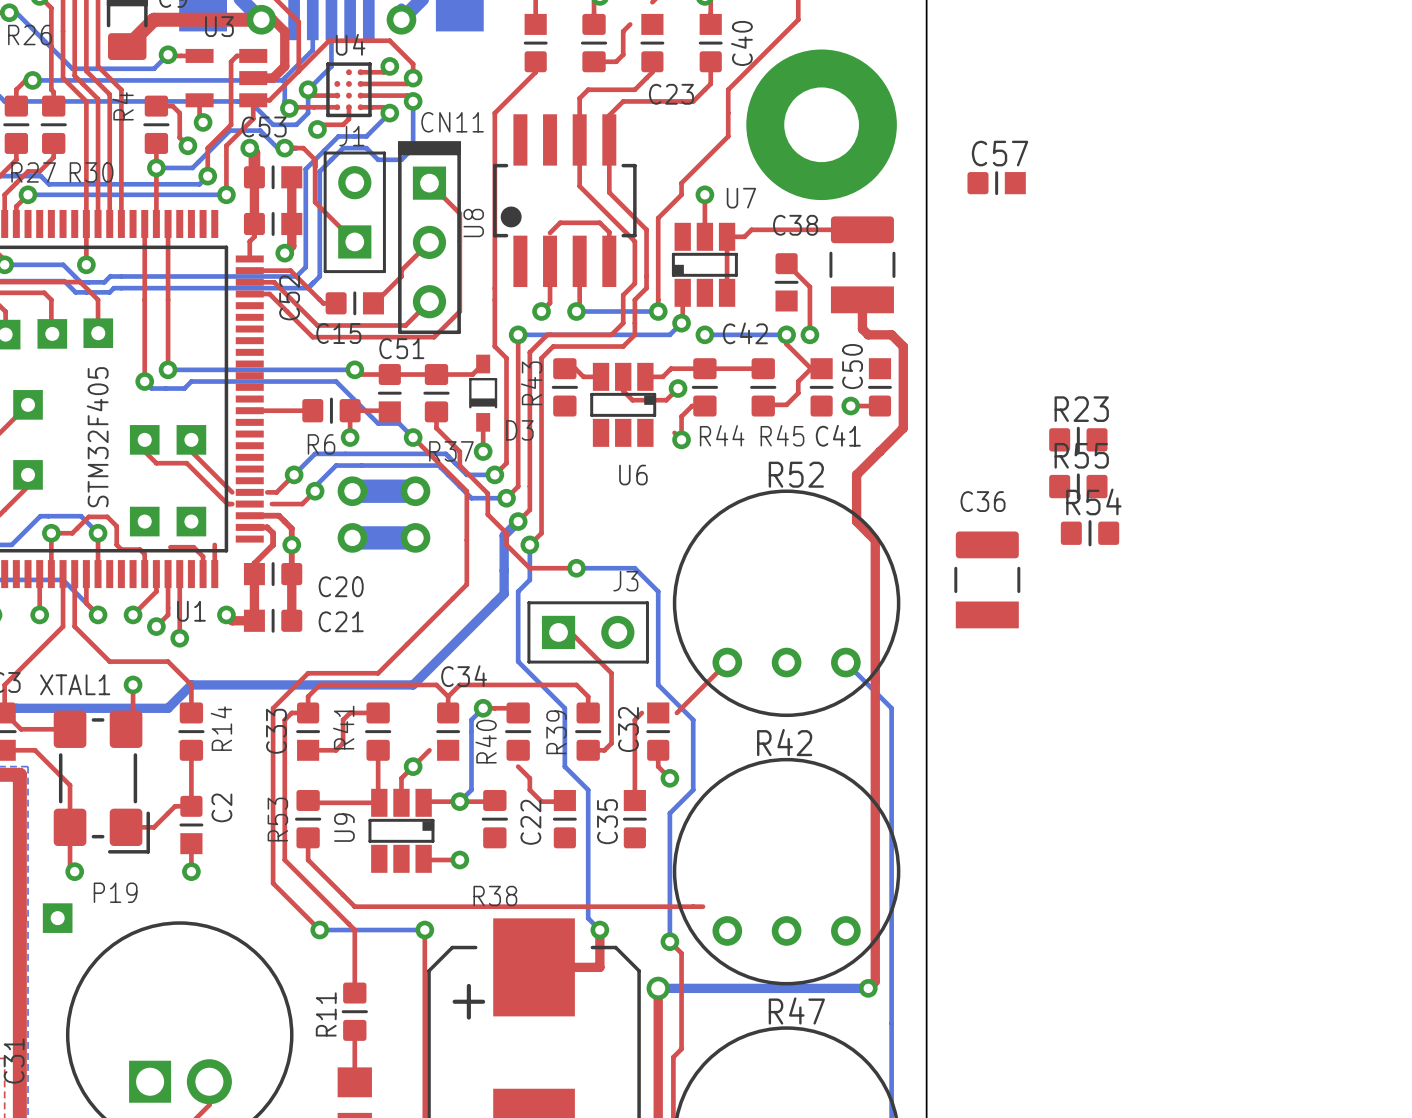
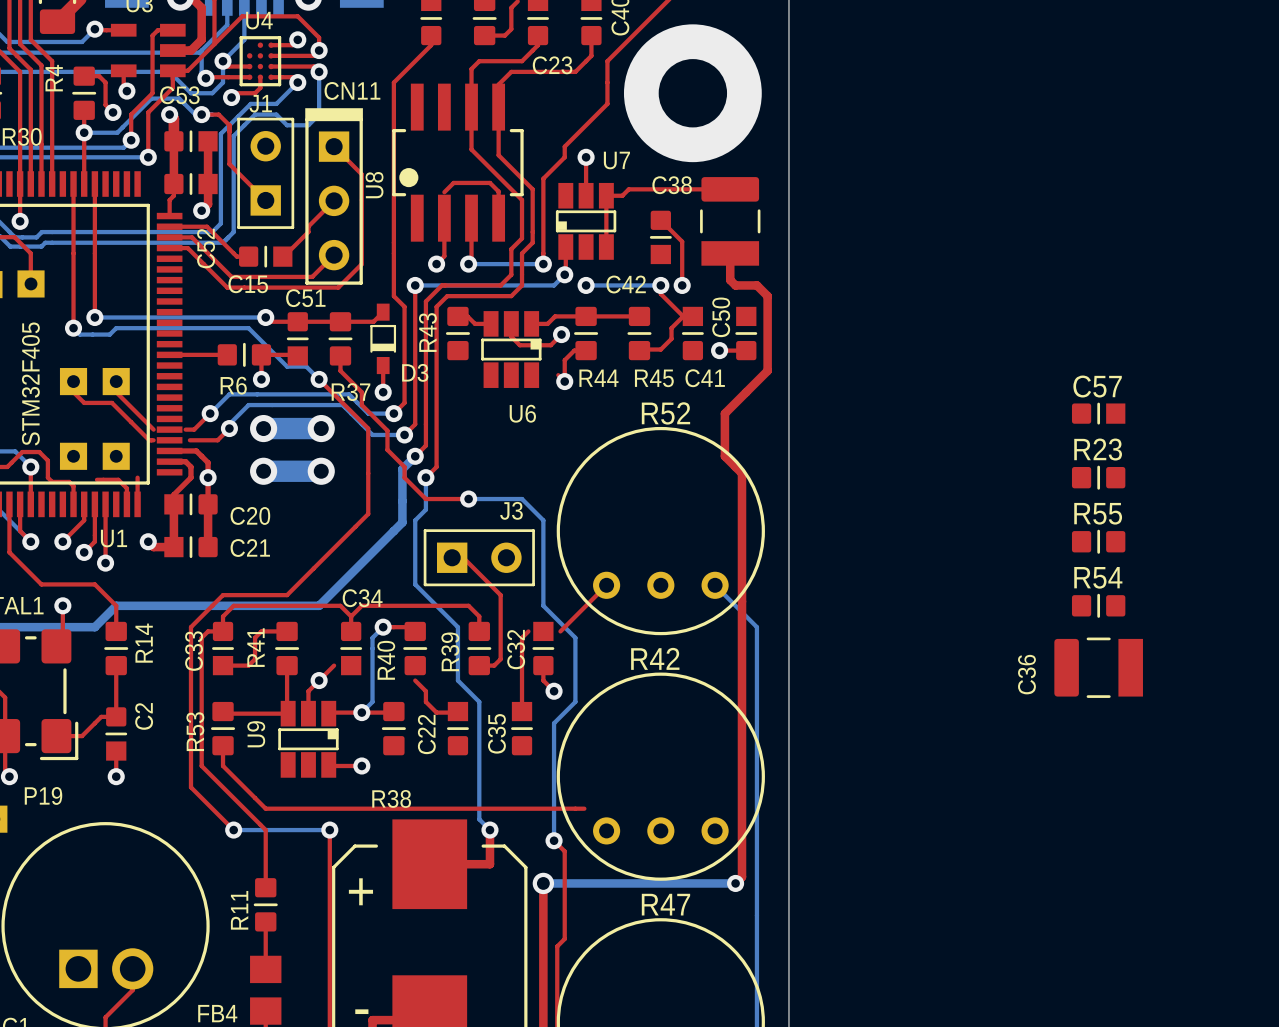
C57 position: (996, 183) -> (1098, 413)
R23 position: (1078, 439) -> (1098, 477)
R55 position: (1078, 486) -> (1098, 541)
R54 position: (1090, 533) -> (1098, 605)
C36 rotation: 0° (987, 579) -> 90° counterclockwise (1098, 667)
C36 position: (987, 579) -> (1098, 667)

